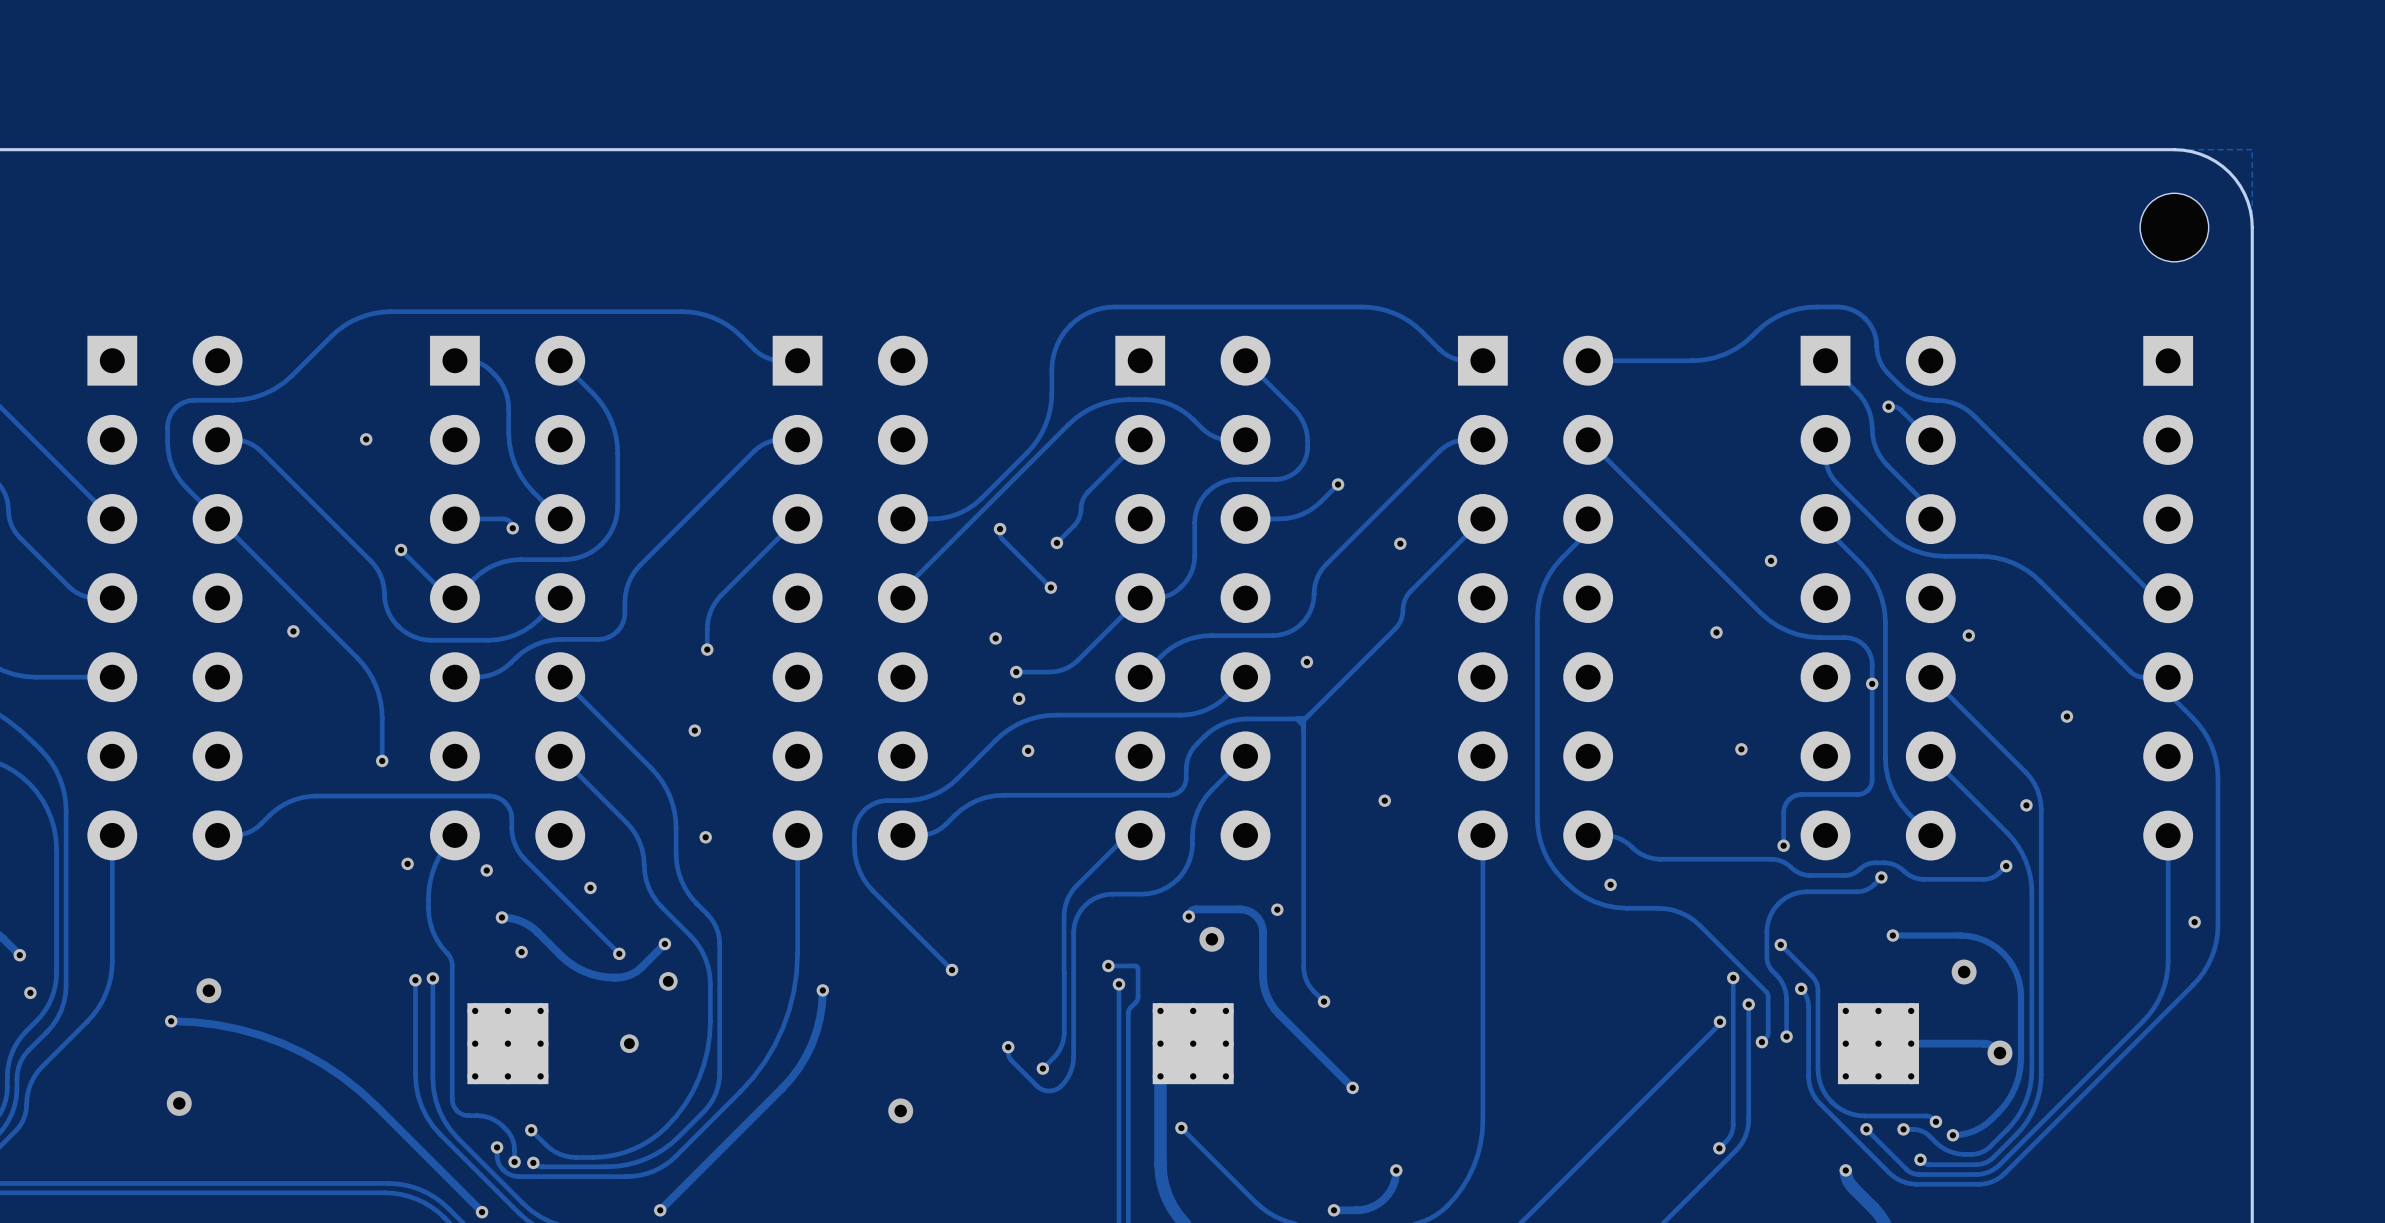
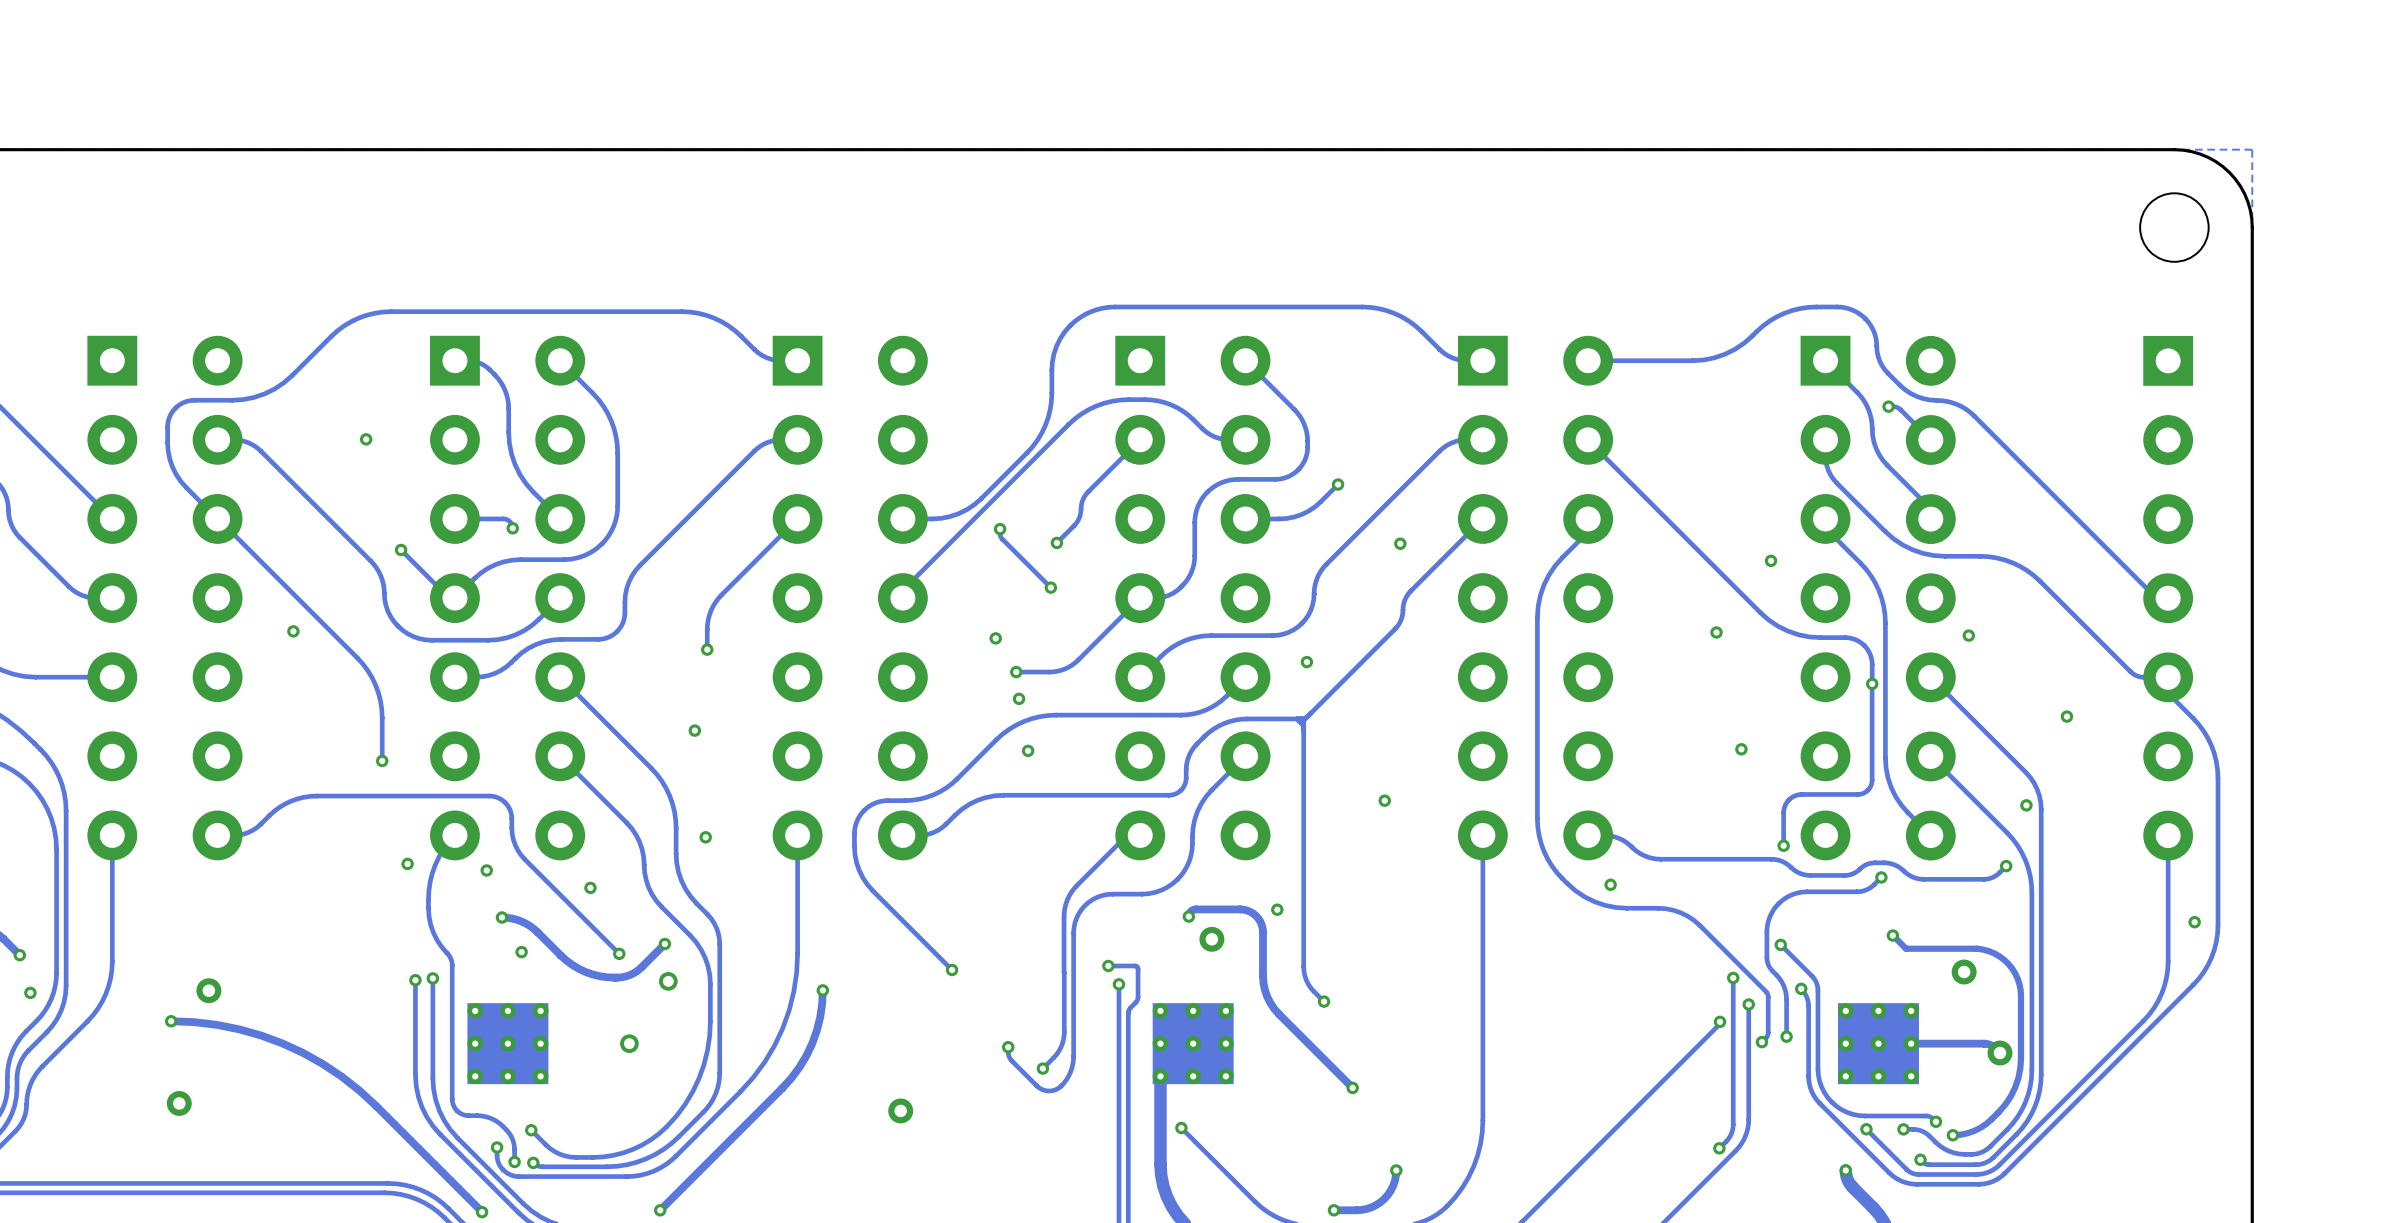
track: (1892, 935) (1960, 935) (1983, 940) (1997, 948) (2008, 959) (2016, 972) (2021, 996) -> (1892, 935) (1906, 948) (1977, 948) (1994, 953) (2008, 963) (2015, 973) (2021, 996)

